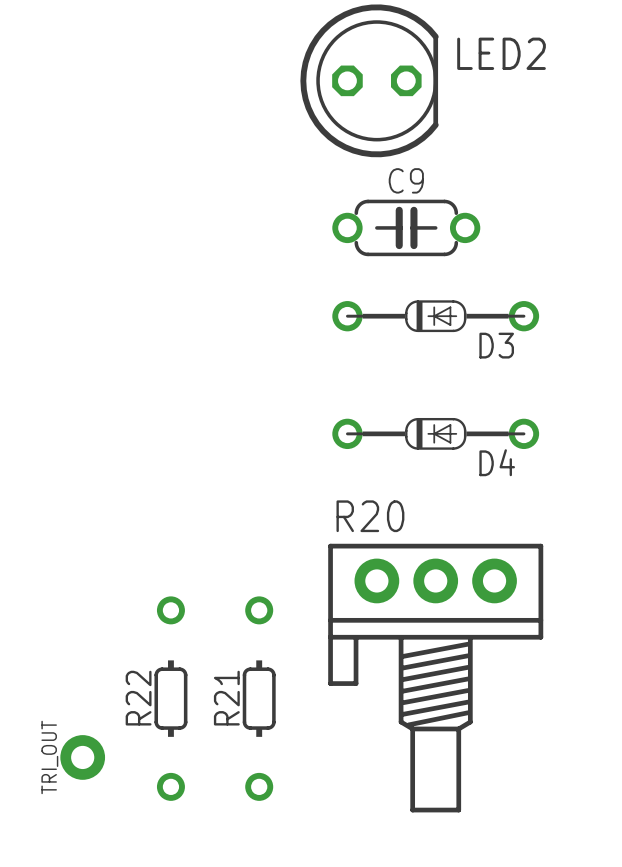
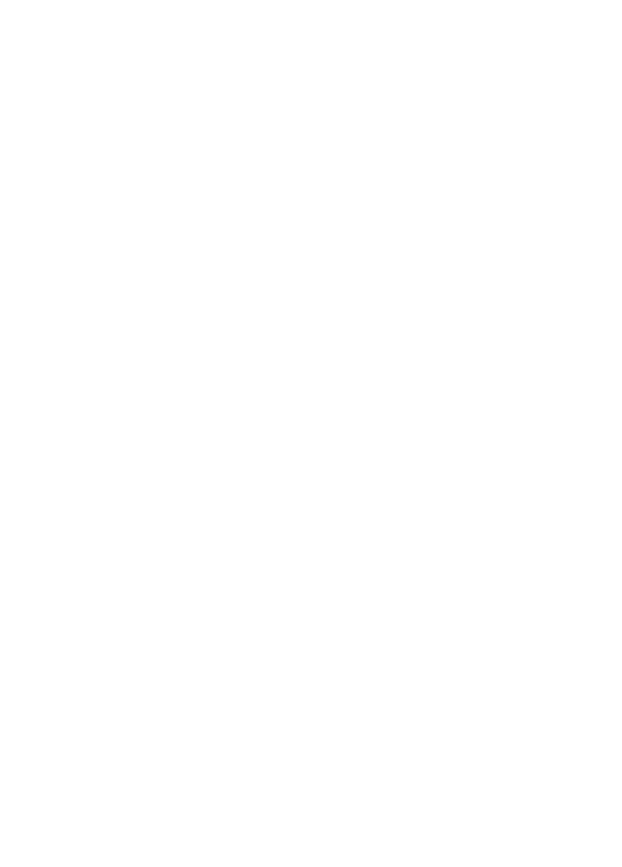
LED2: (369, 80) -> none
C9: (406, 227) -> none
D3: (435, 316) -> none
D4: (435, 433) -> none
R20: (435, 678) -> none
R22: (170, 698) -> none
R21: (259, 698) -> none
TRI_OUT: (82, 757) -> none

